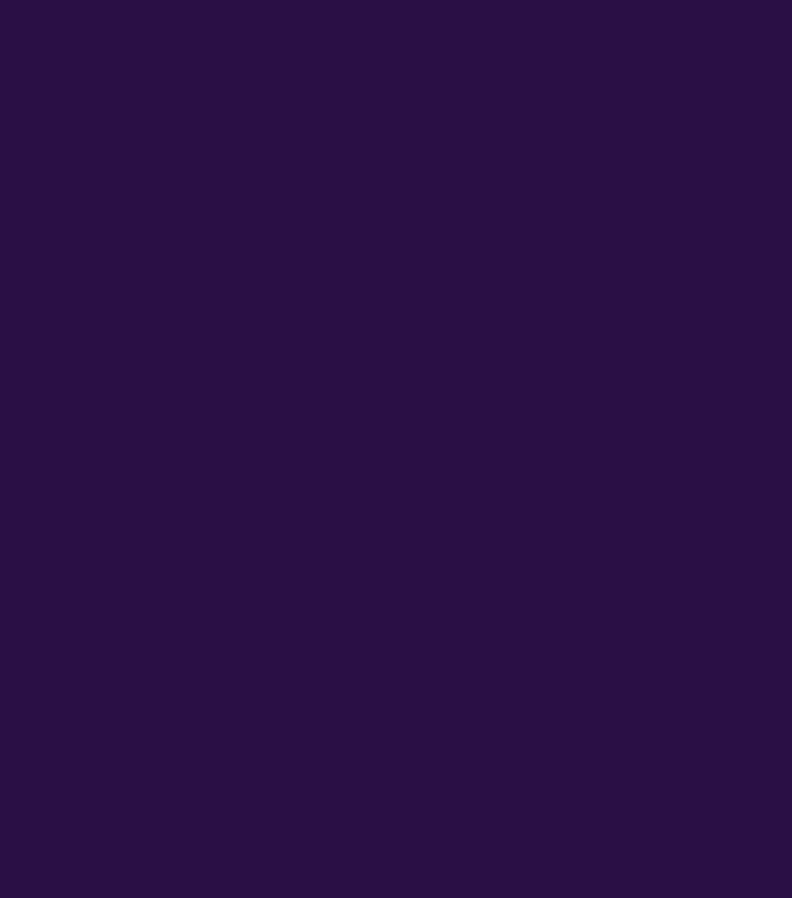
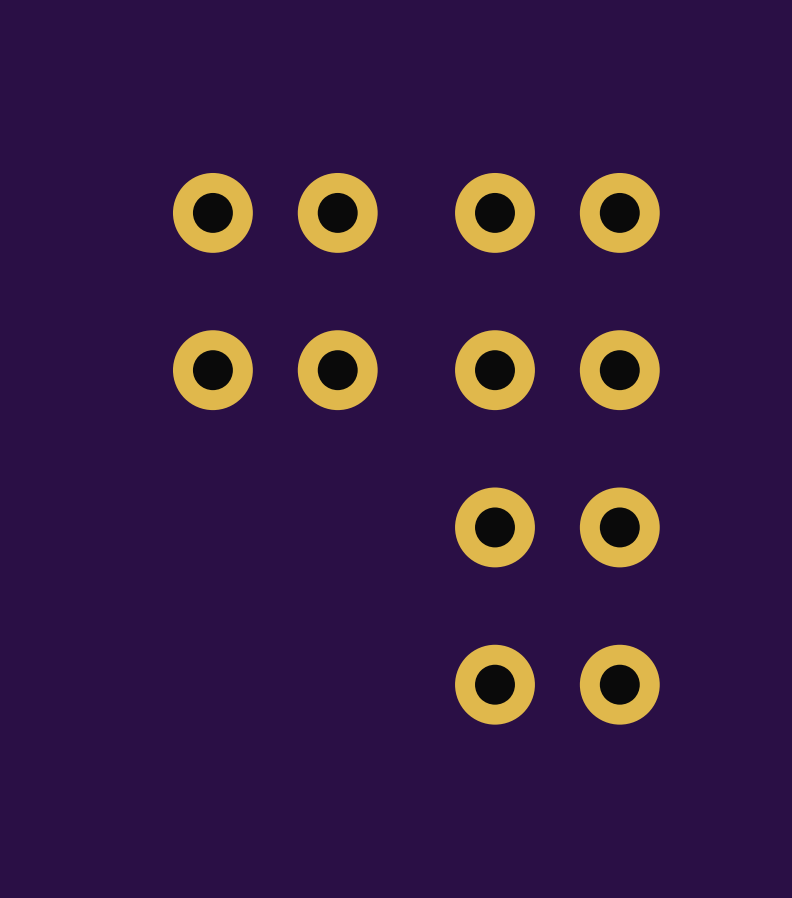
part: none -> (275, 212)
part: none -> (557, 212)
part: none -> (275, 370)
part: none -> (557, 370)
part: none -> (557, 527)
part: none -> (557, 684)

